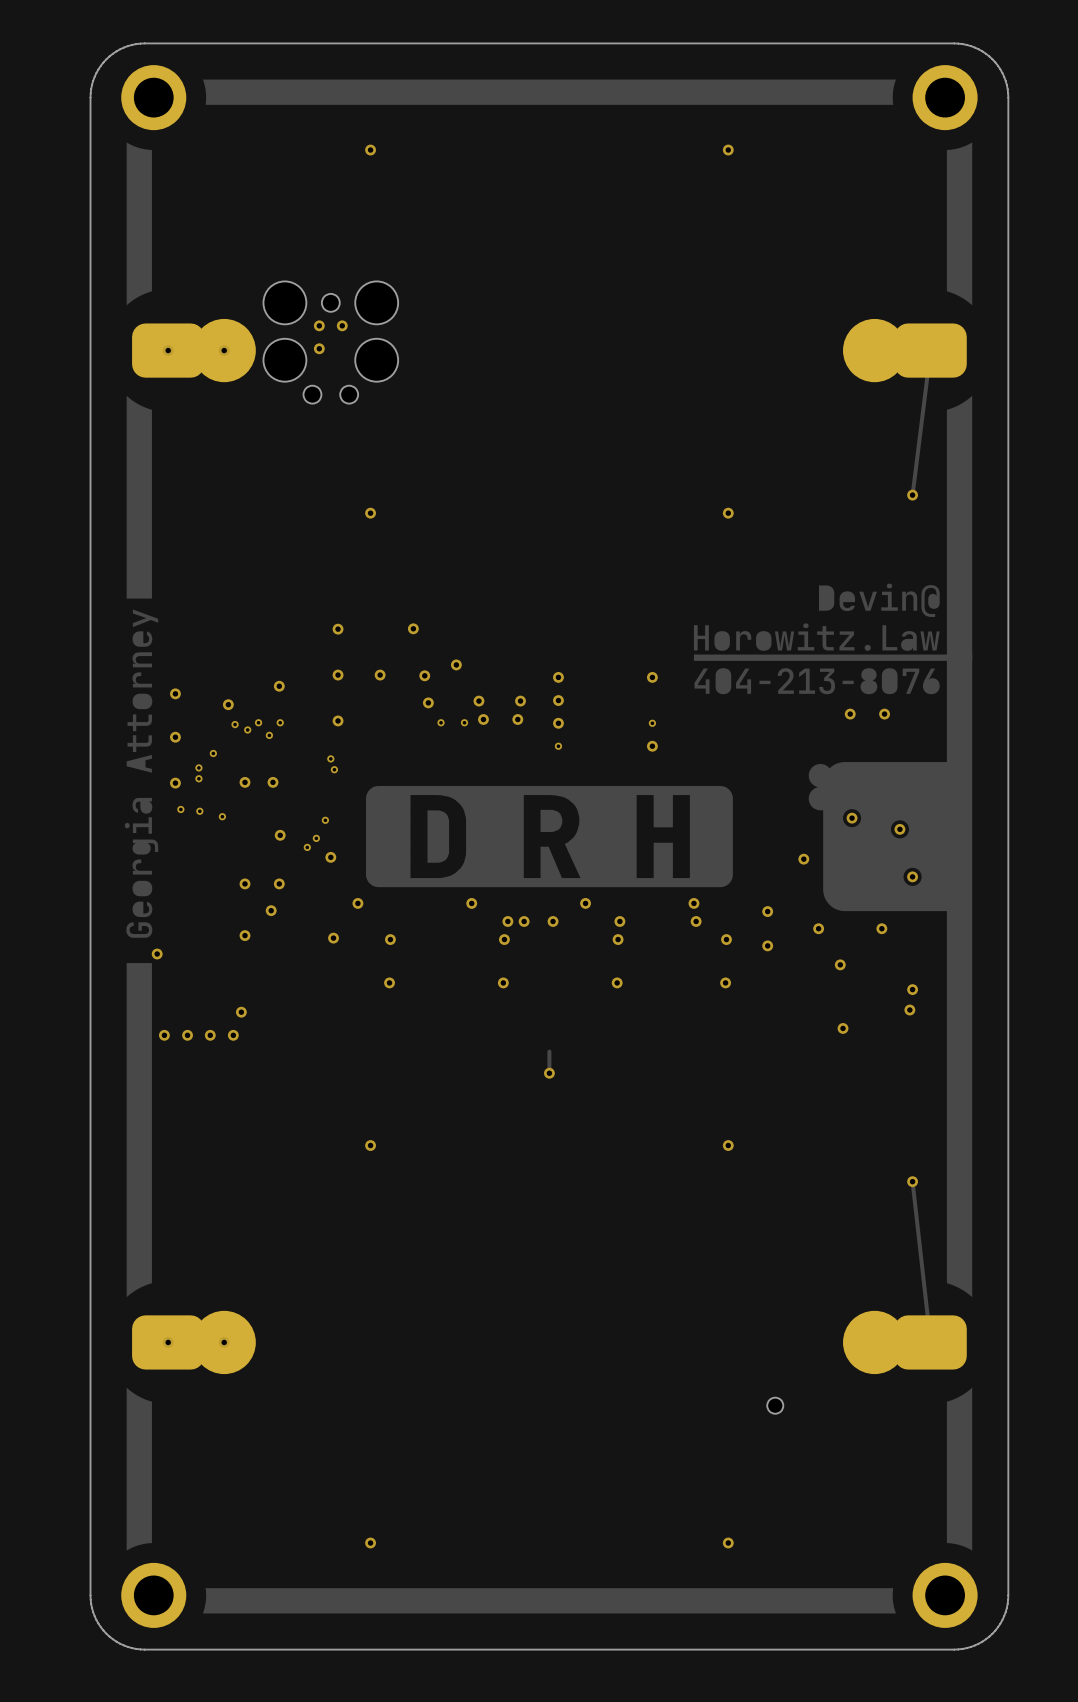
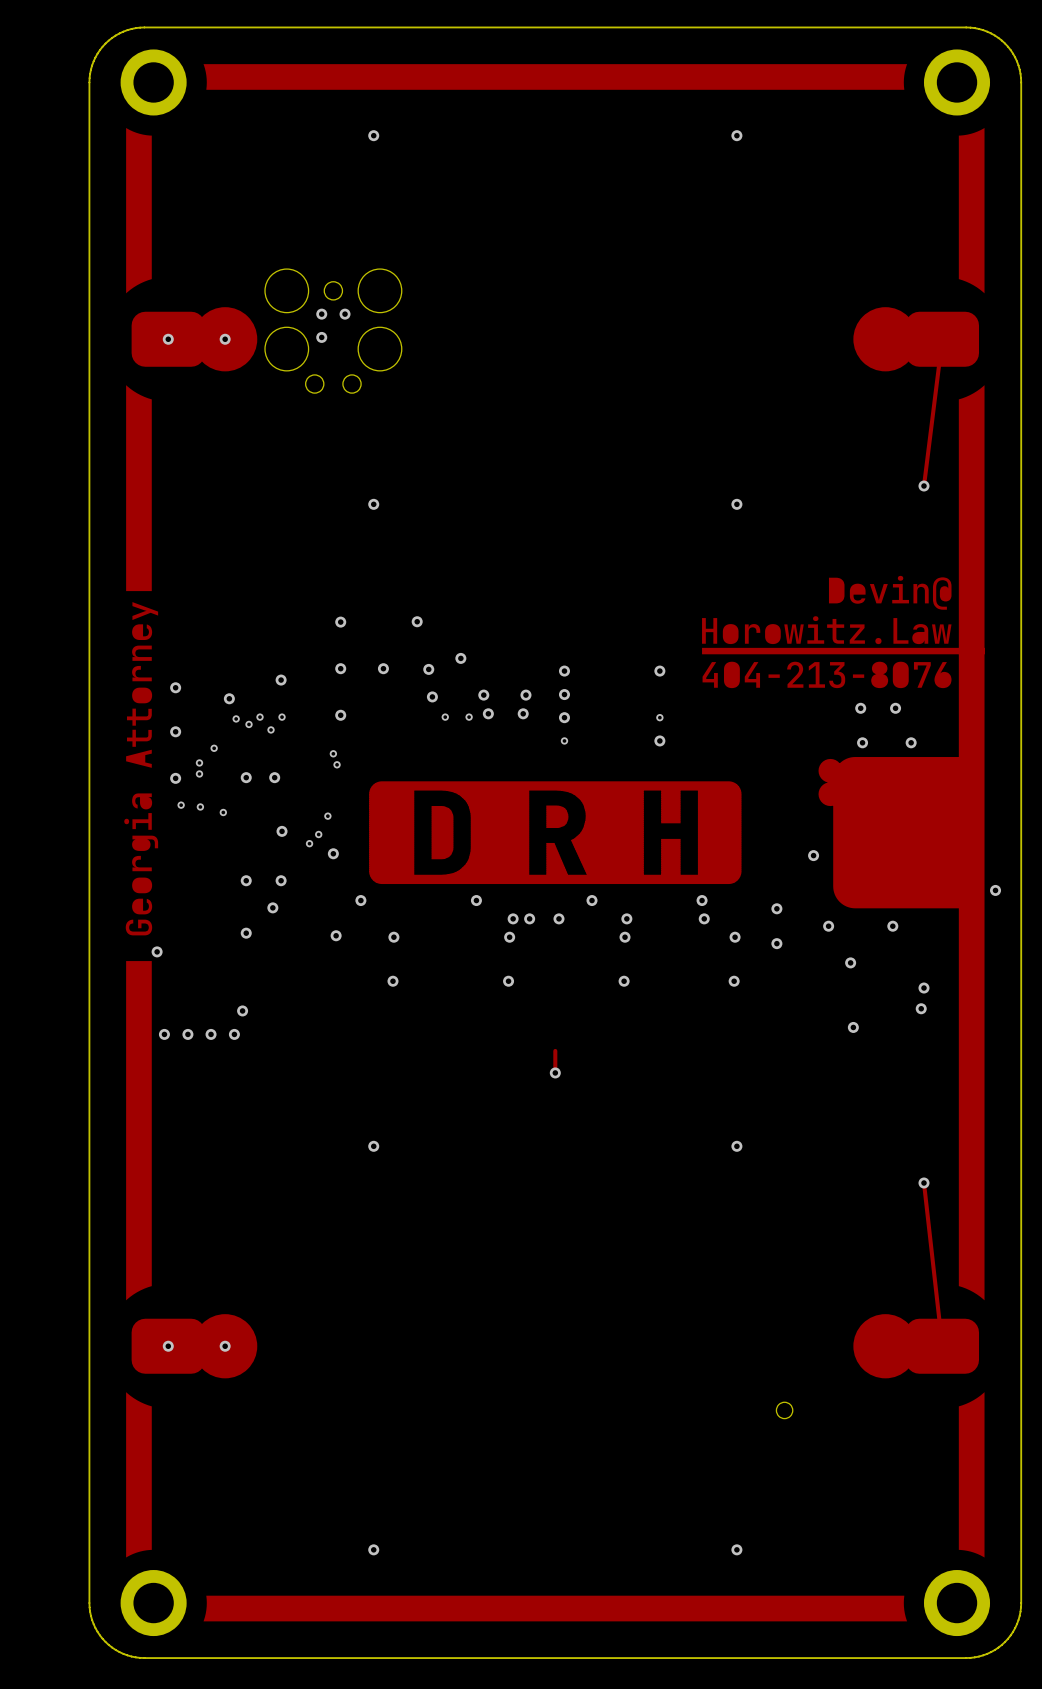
via: none -> (862, 742)
via: none -> (911, 742)
drawing: none -> [850, 802, 875, 826]
drawing: none -> [899, 813, 924, 838]
via: (852, 818) -> none
via: (899, 829) -> none
drawing: none -> [912, 861, 936, 886]
via: (912, 876) -> none
via: none -> (995, 890)

